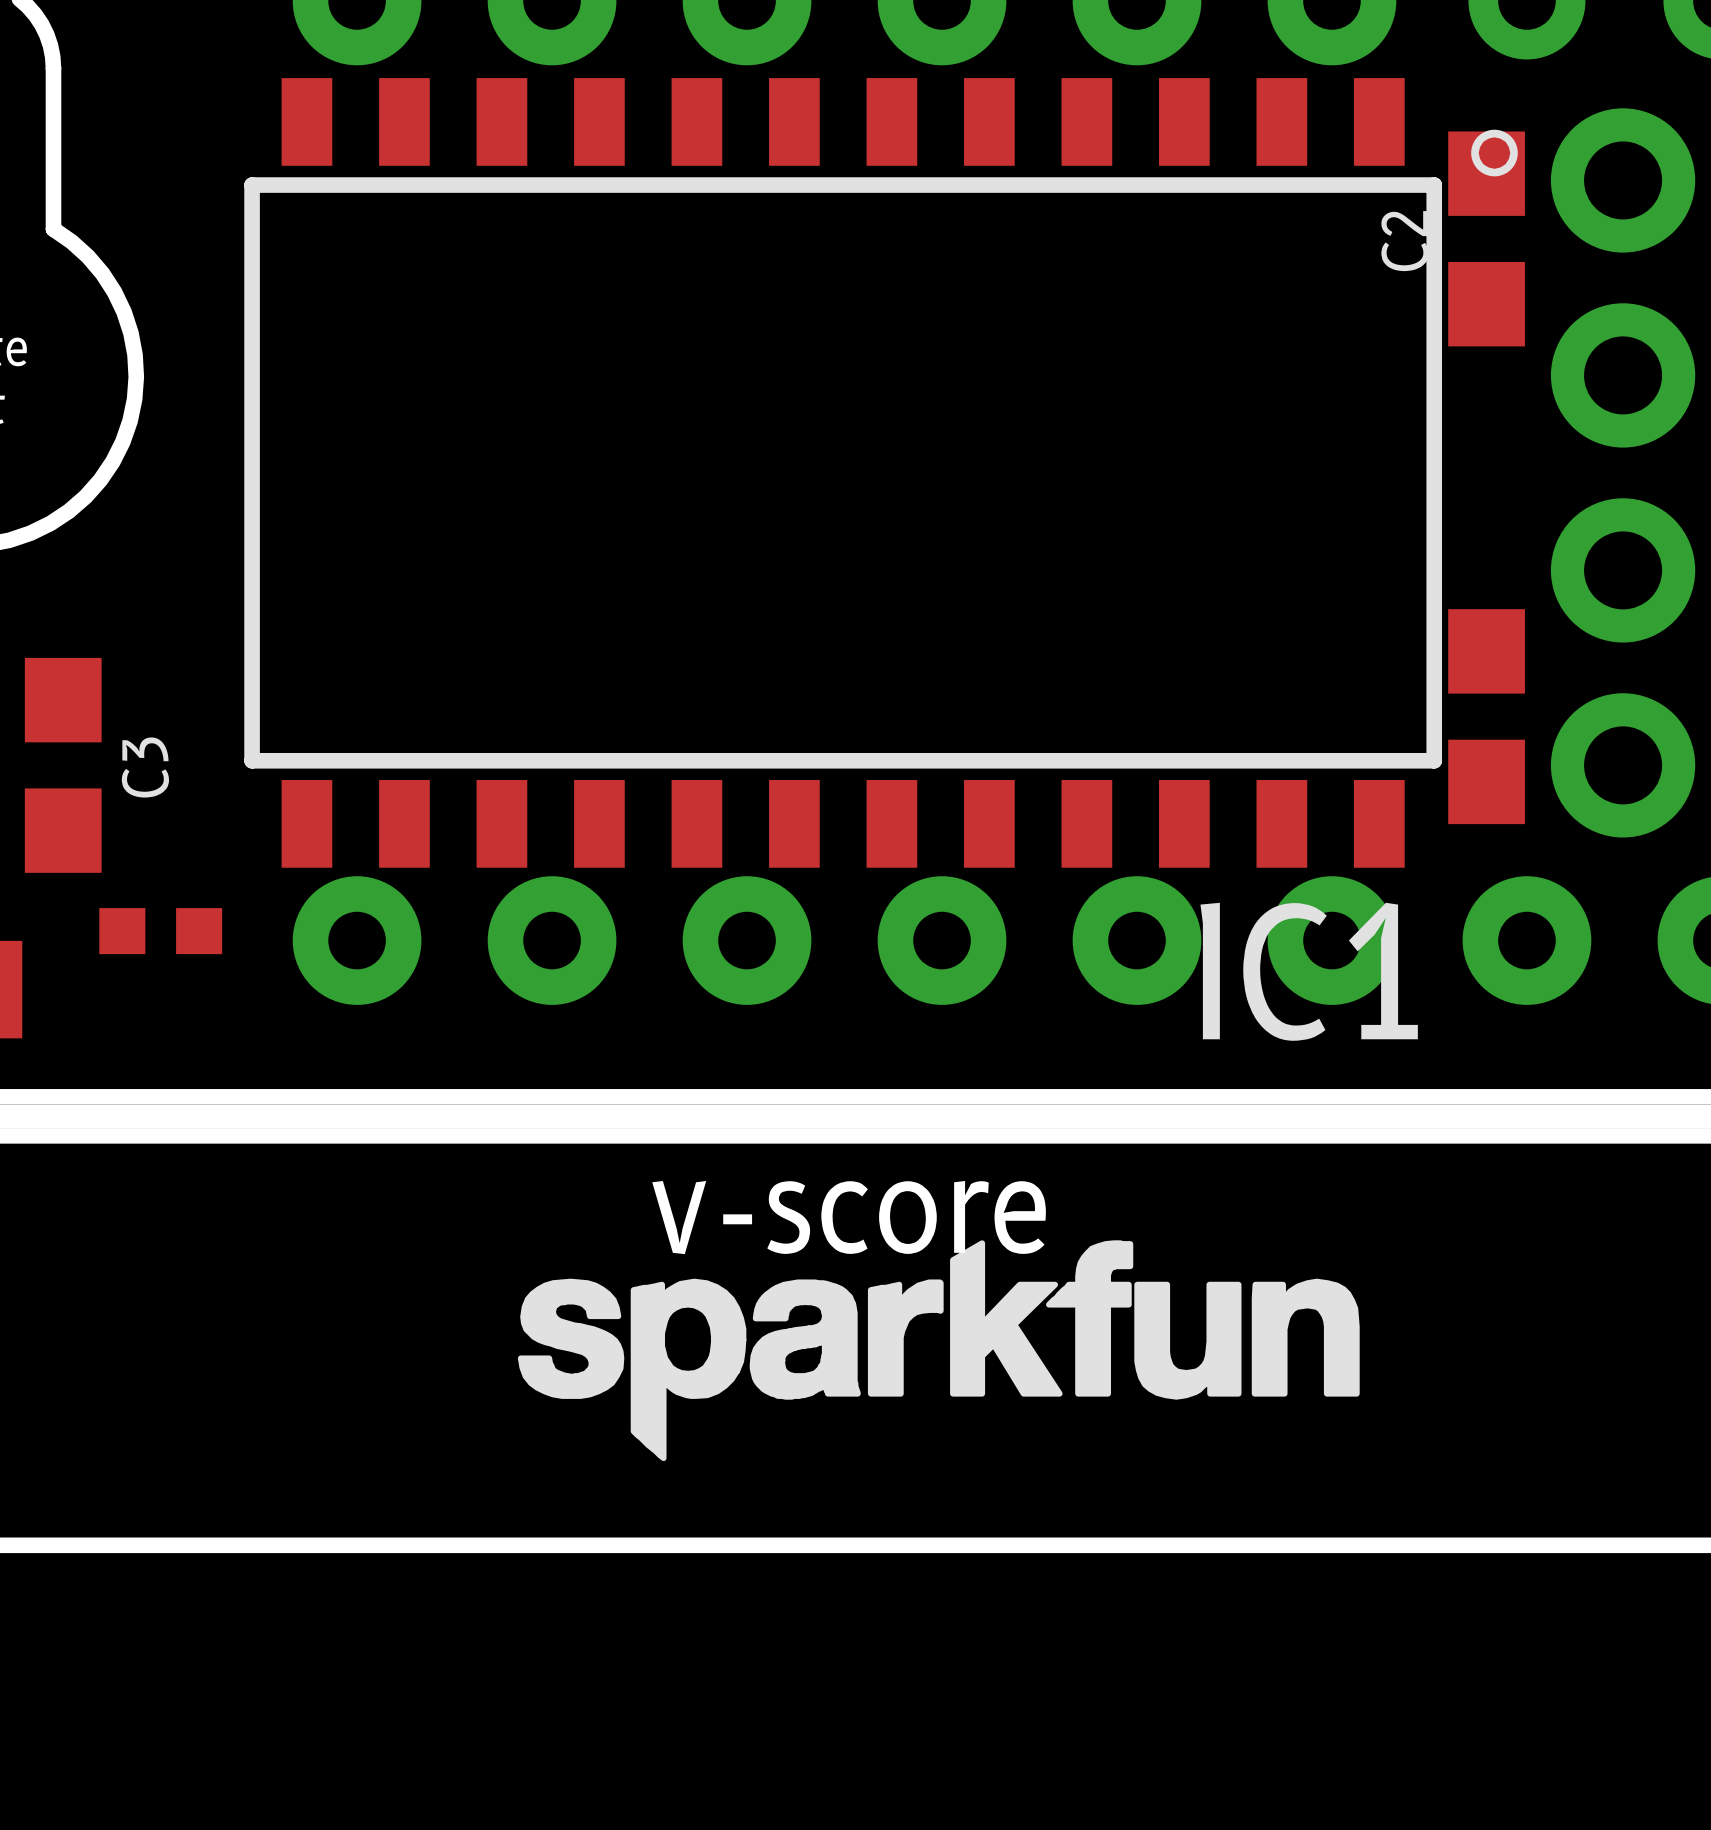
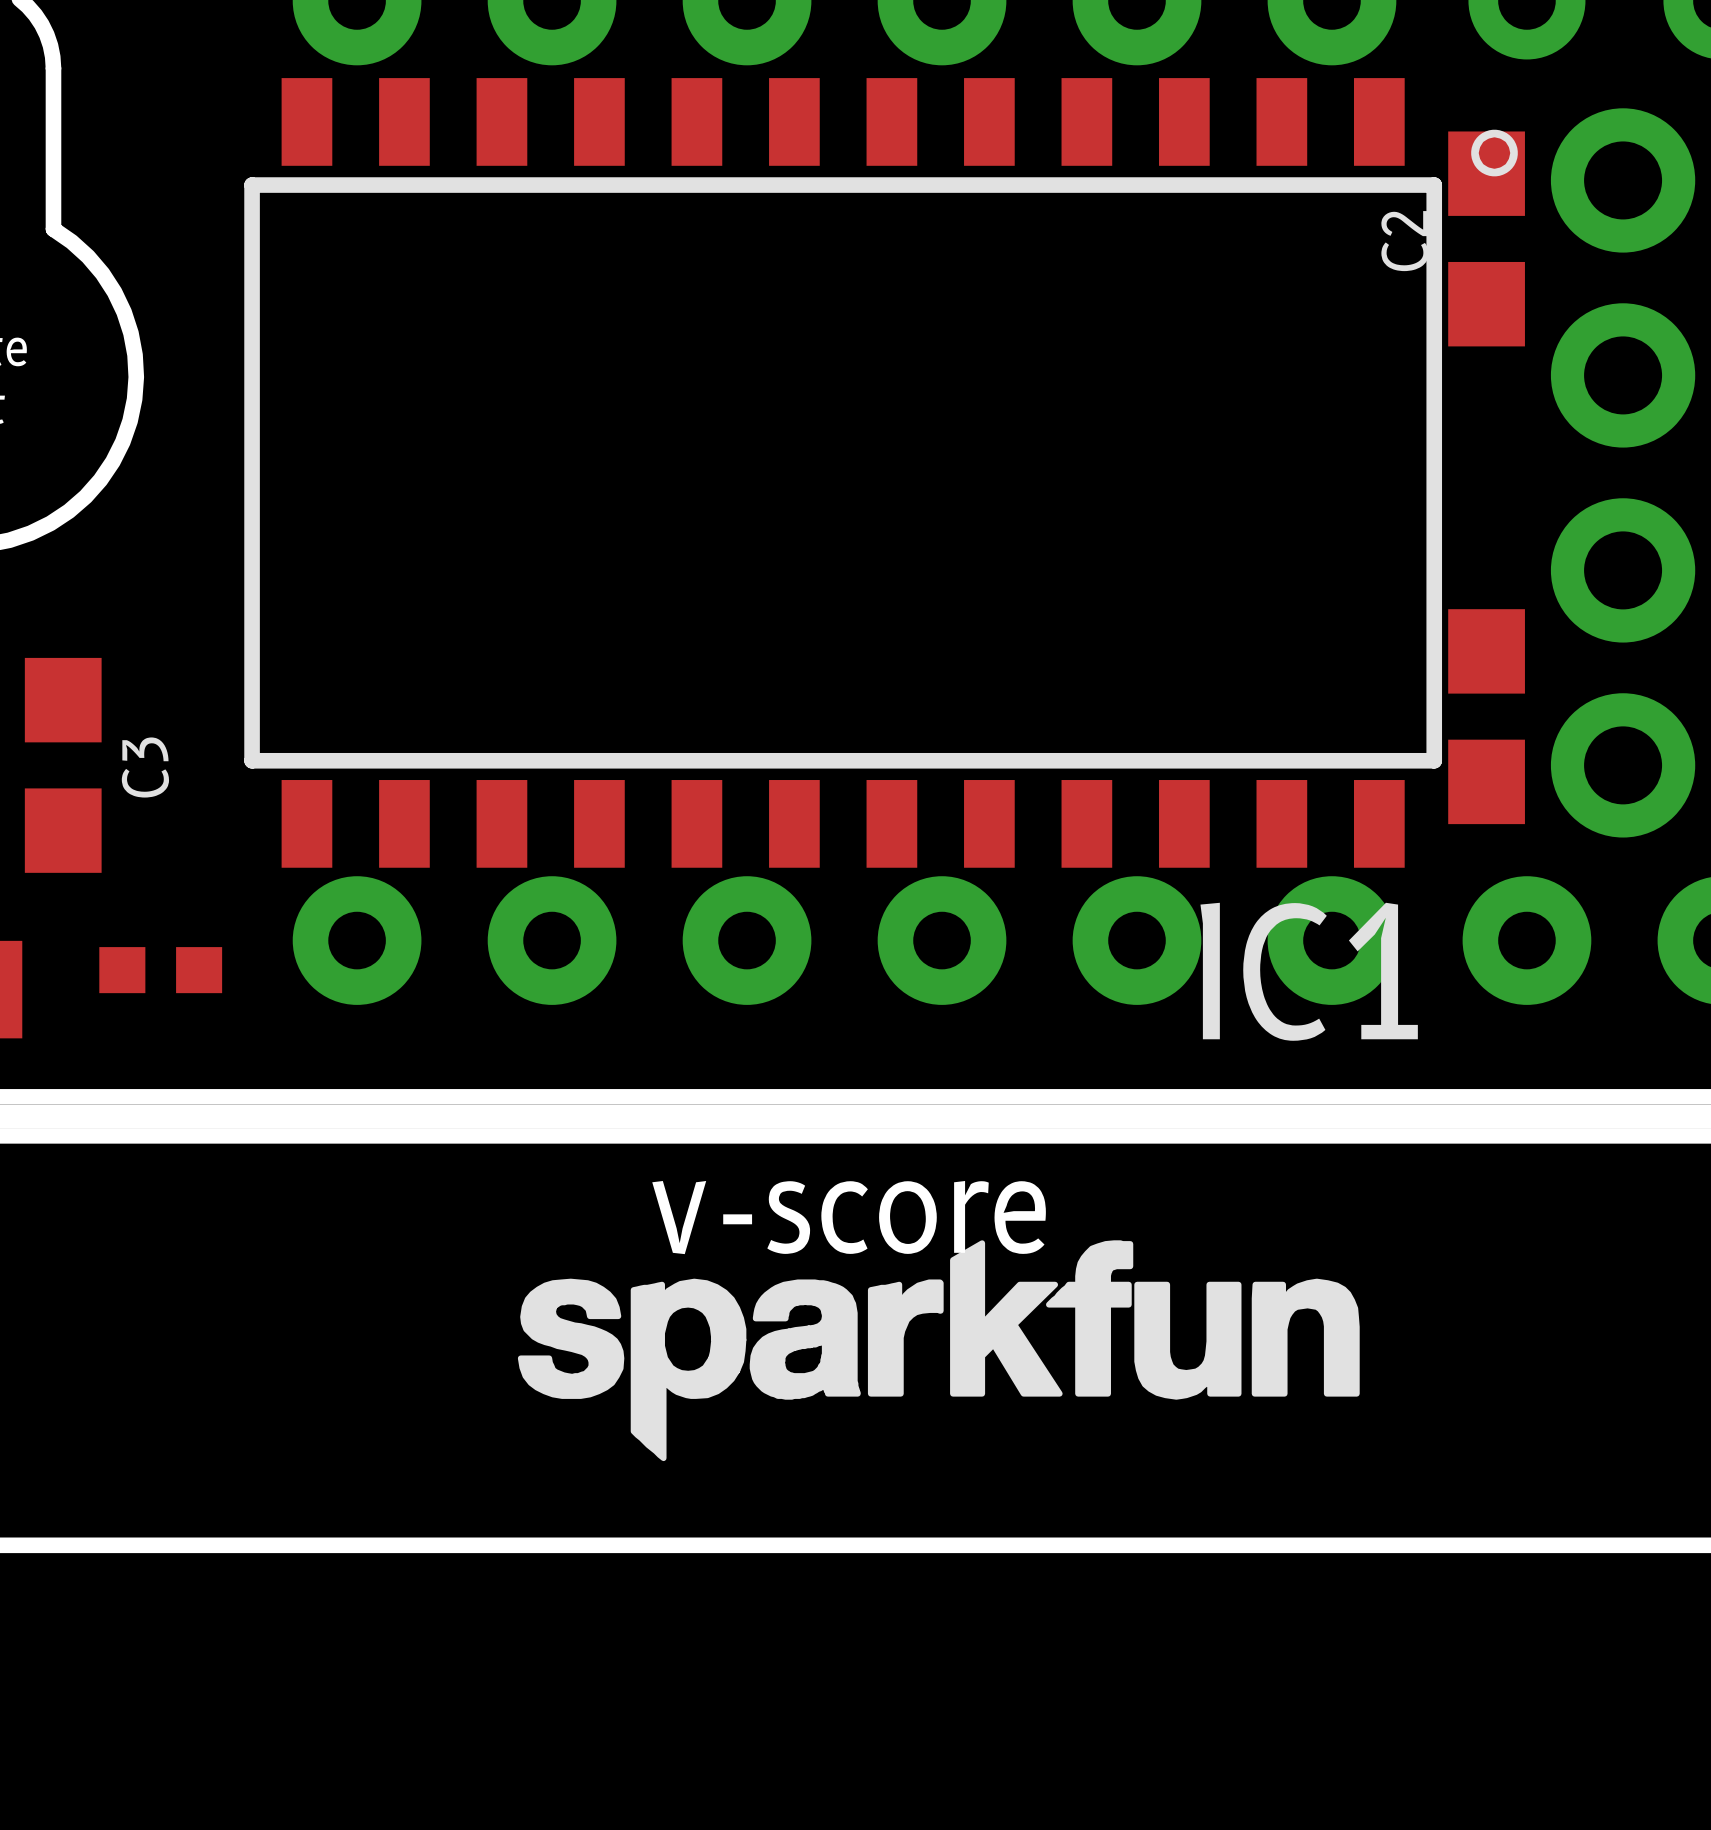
part position: (160, 931) -> (160, 970)

